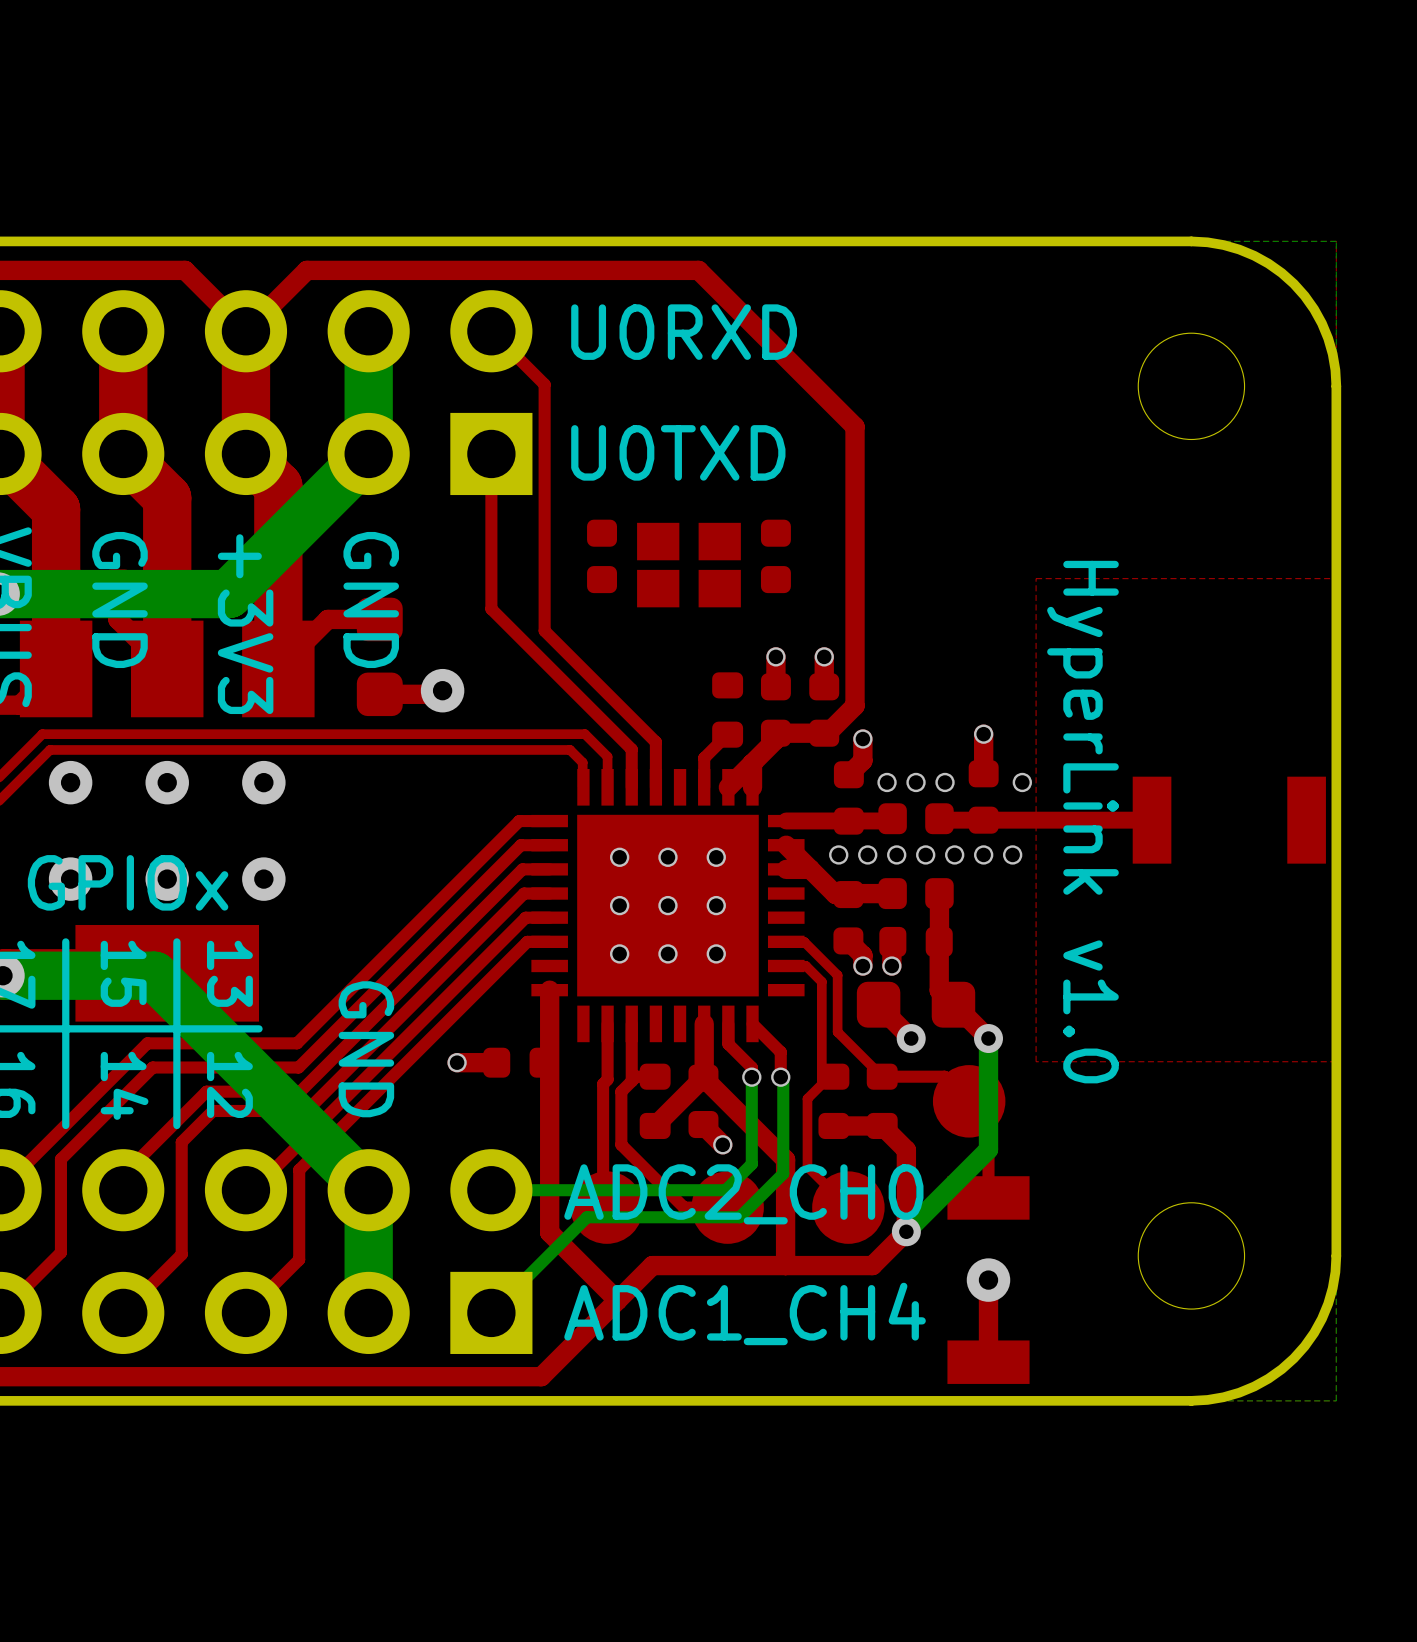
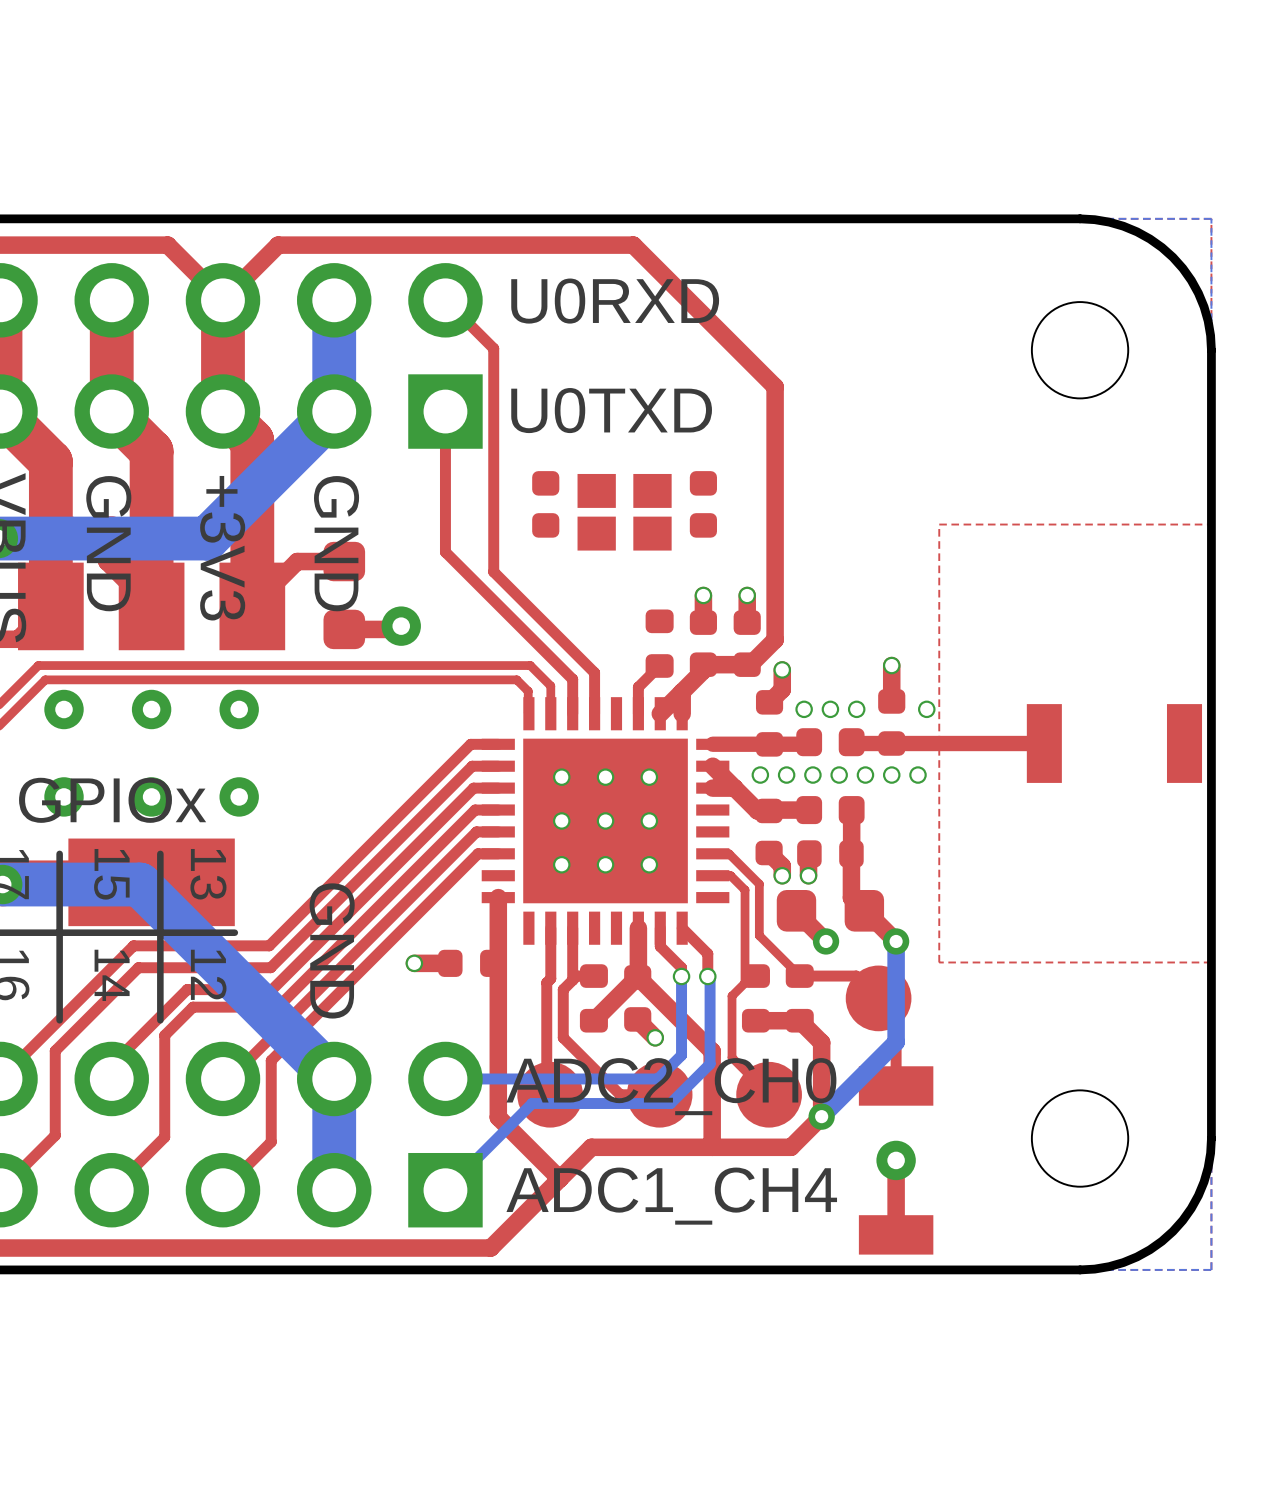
text: HyperLink v1.0 (1082, 822) -> none

